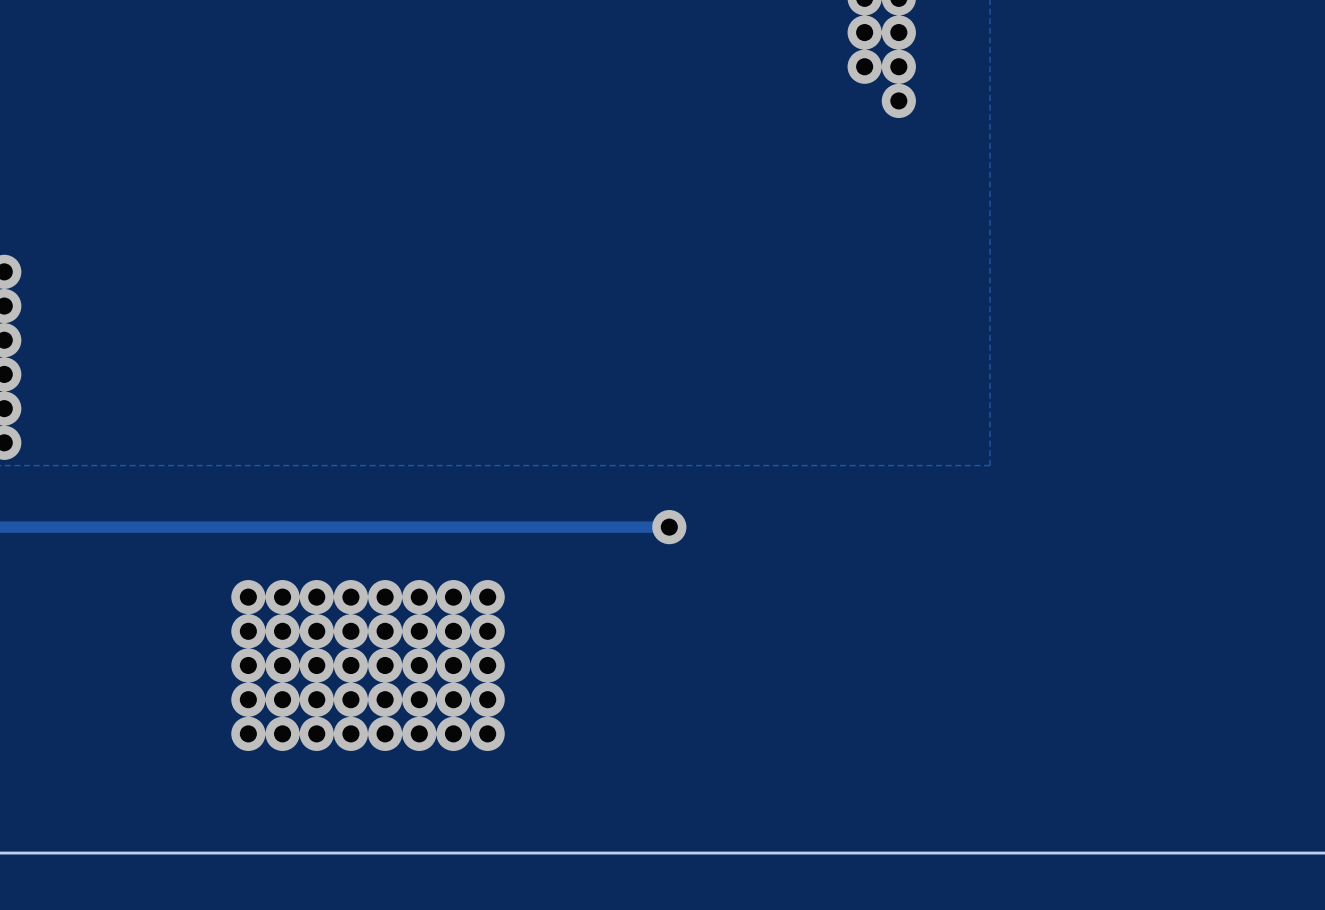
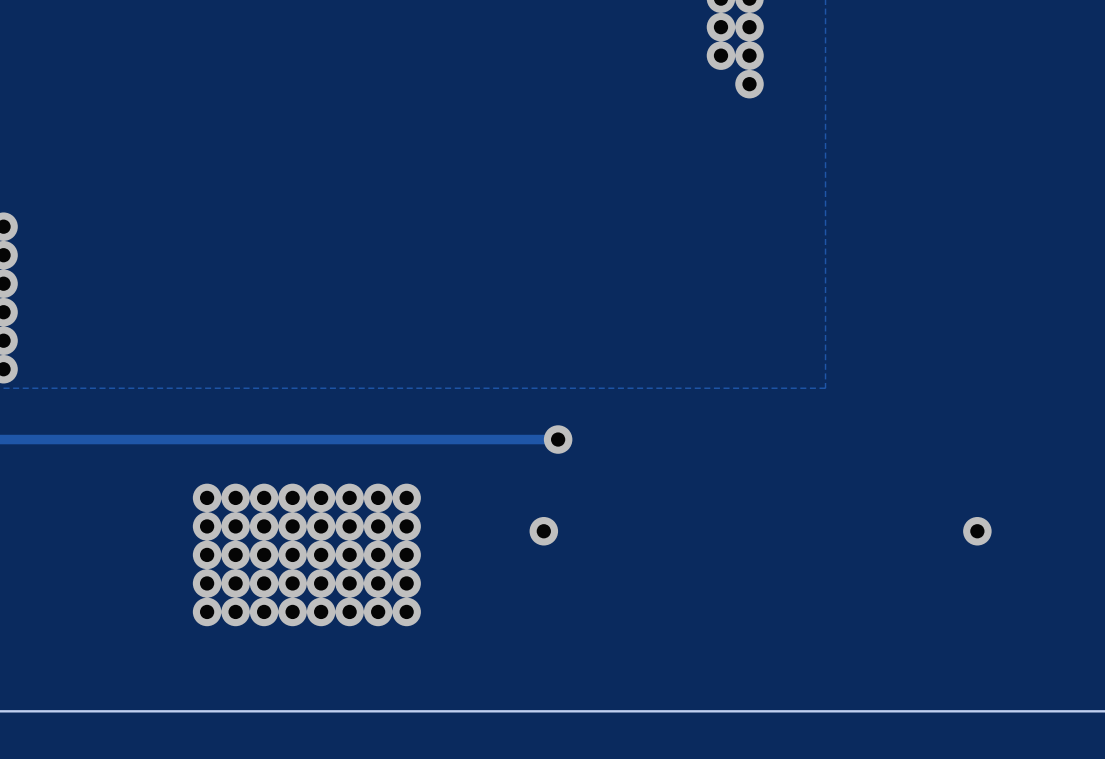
via: none -> (543, 531)
via: none -> (977, 531)

